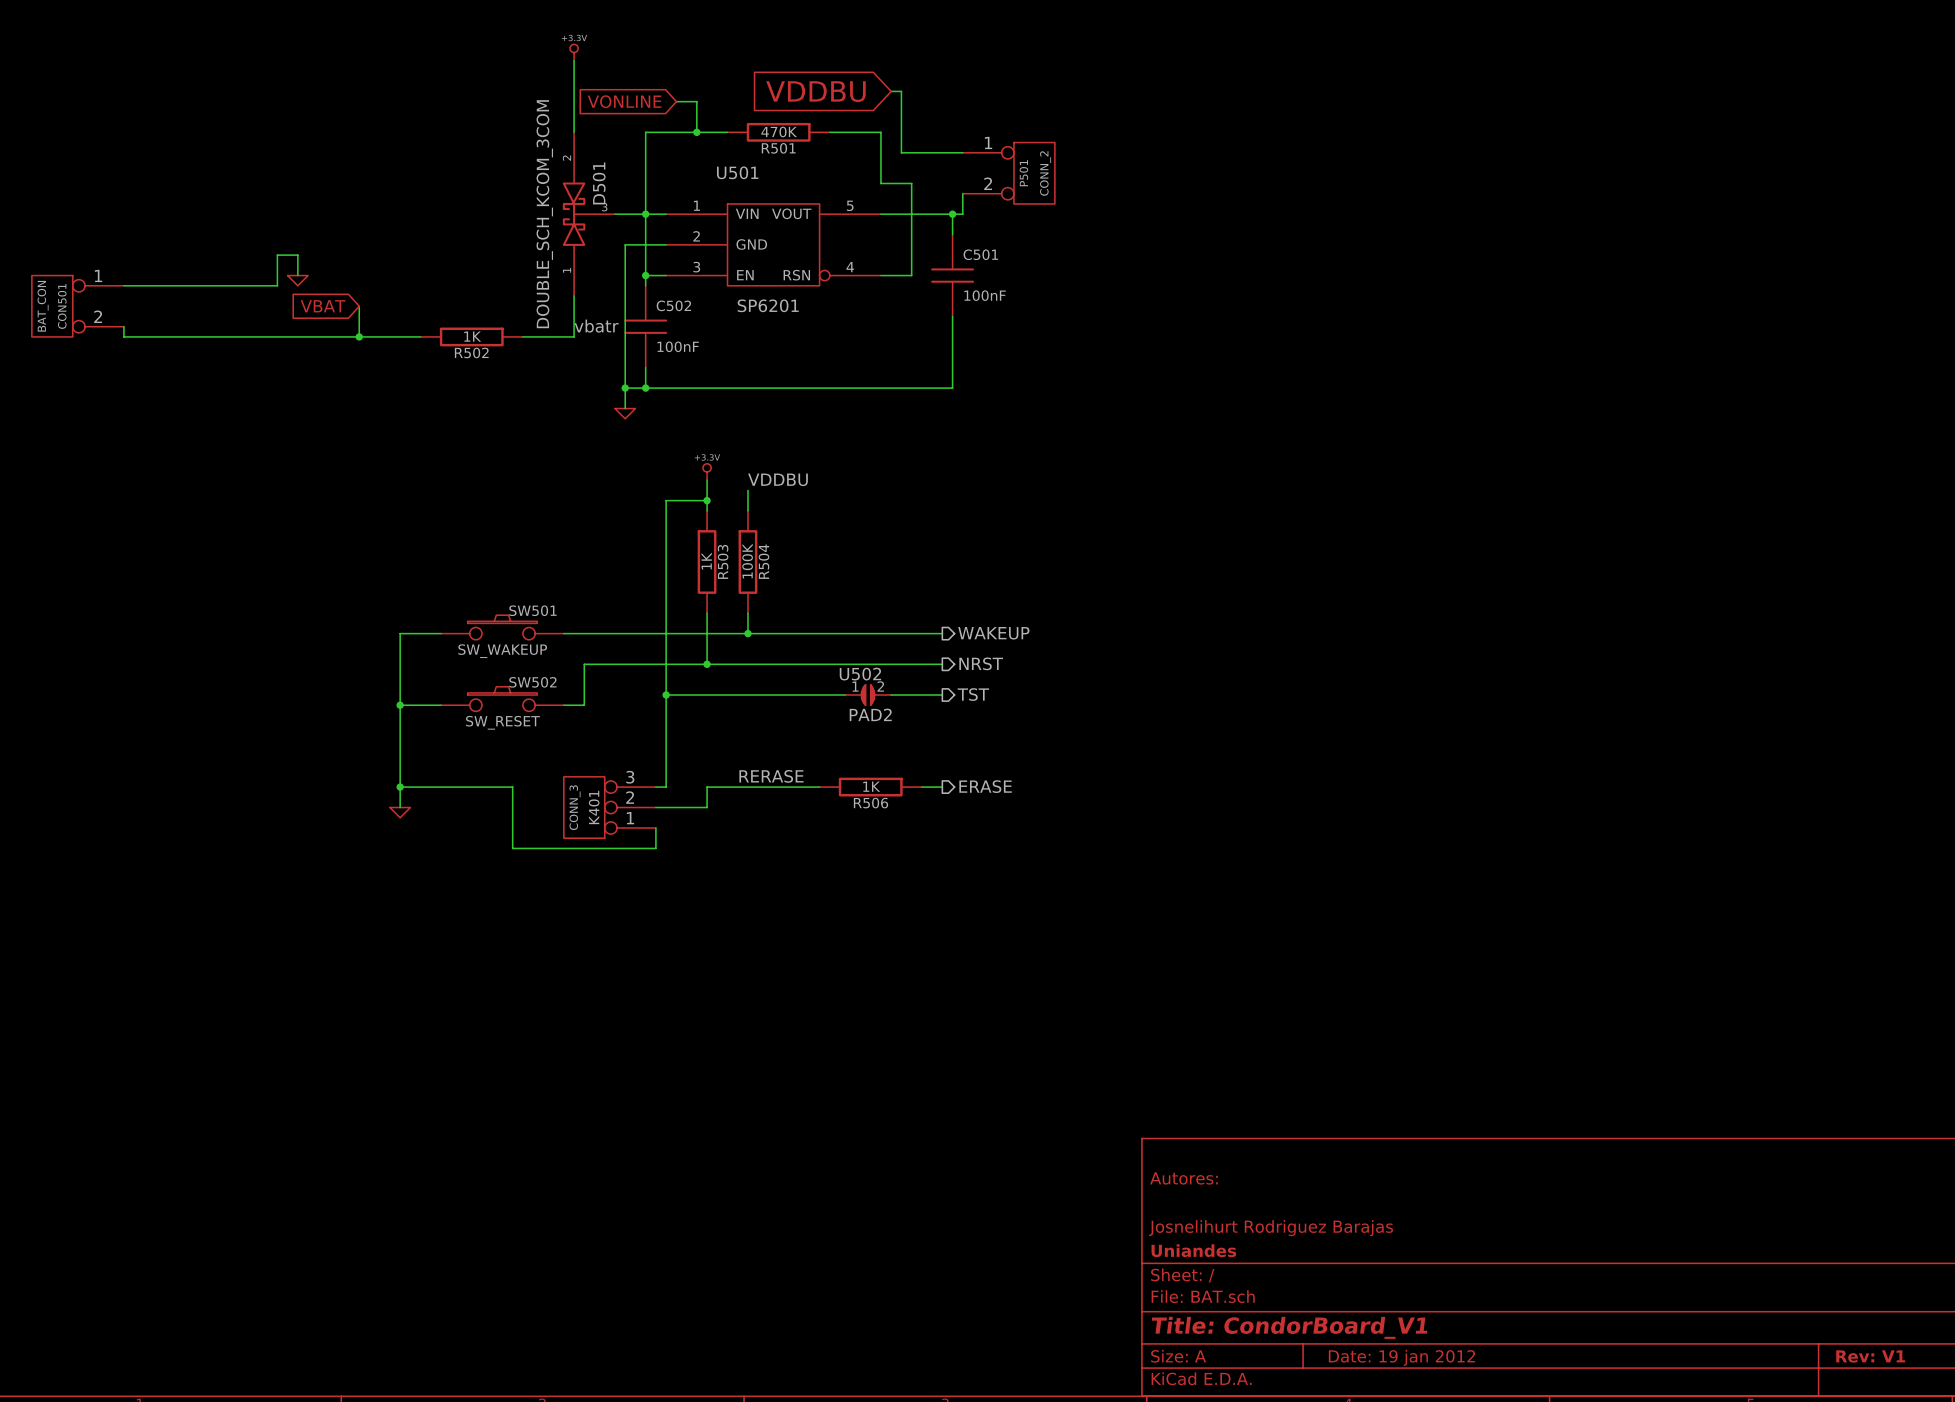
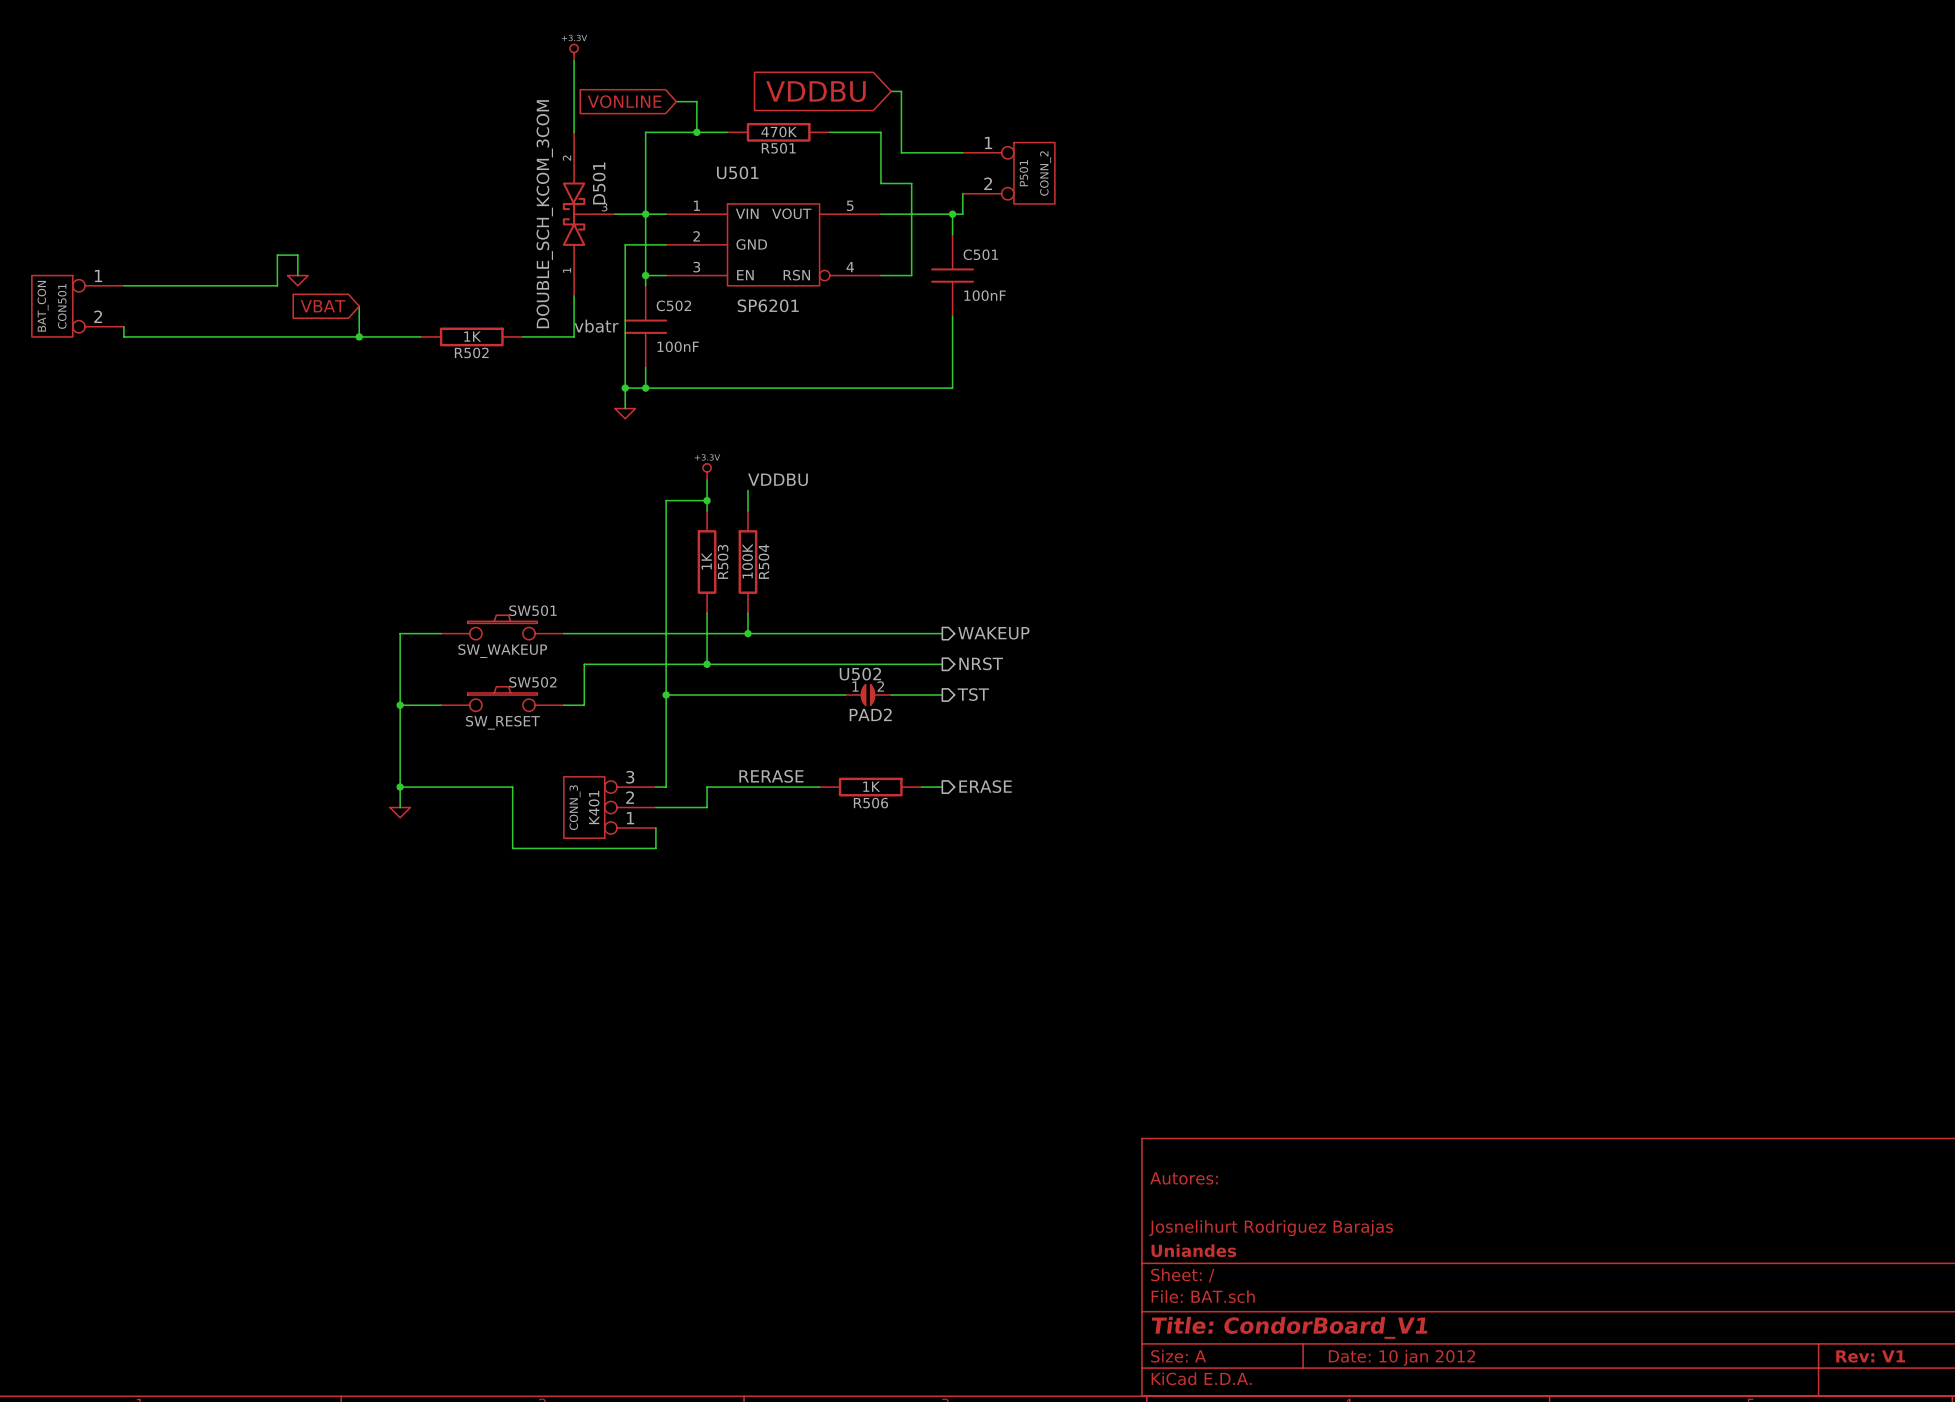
title block: Date: 19 jan 2012 (1401, 1357) -> Date: 10 jan 2012 (1401, 1357)

